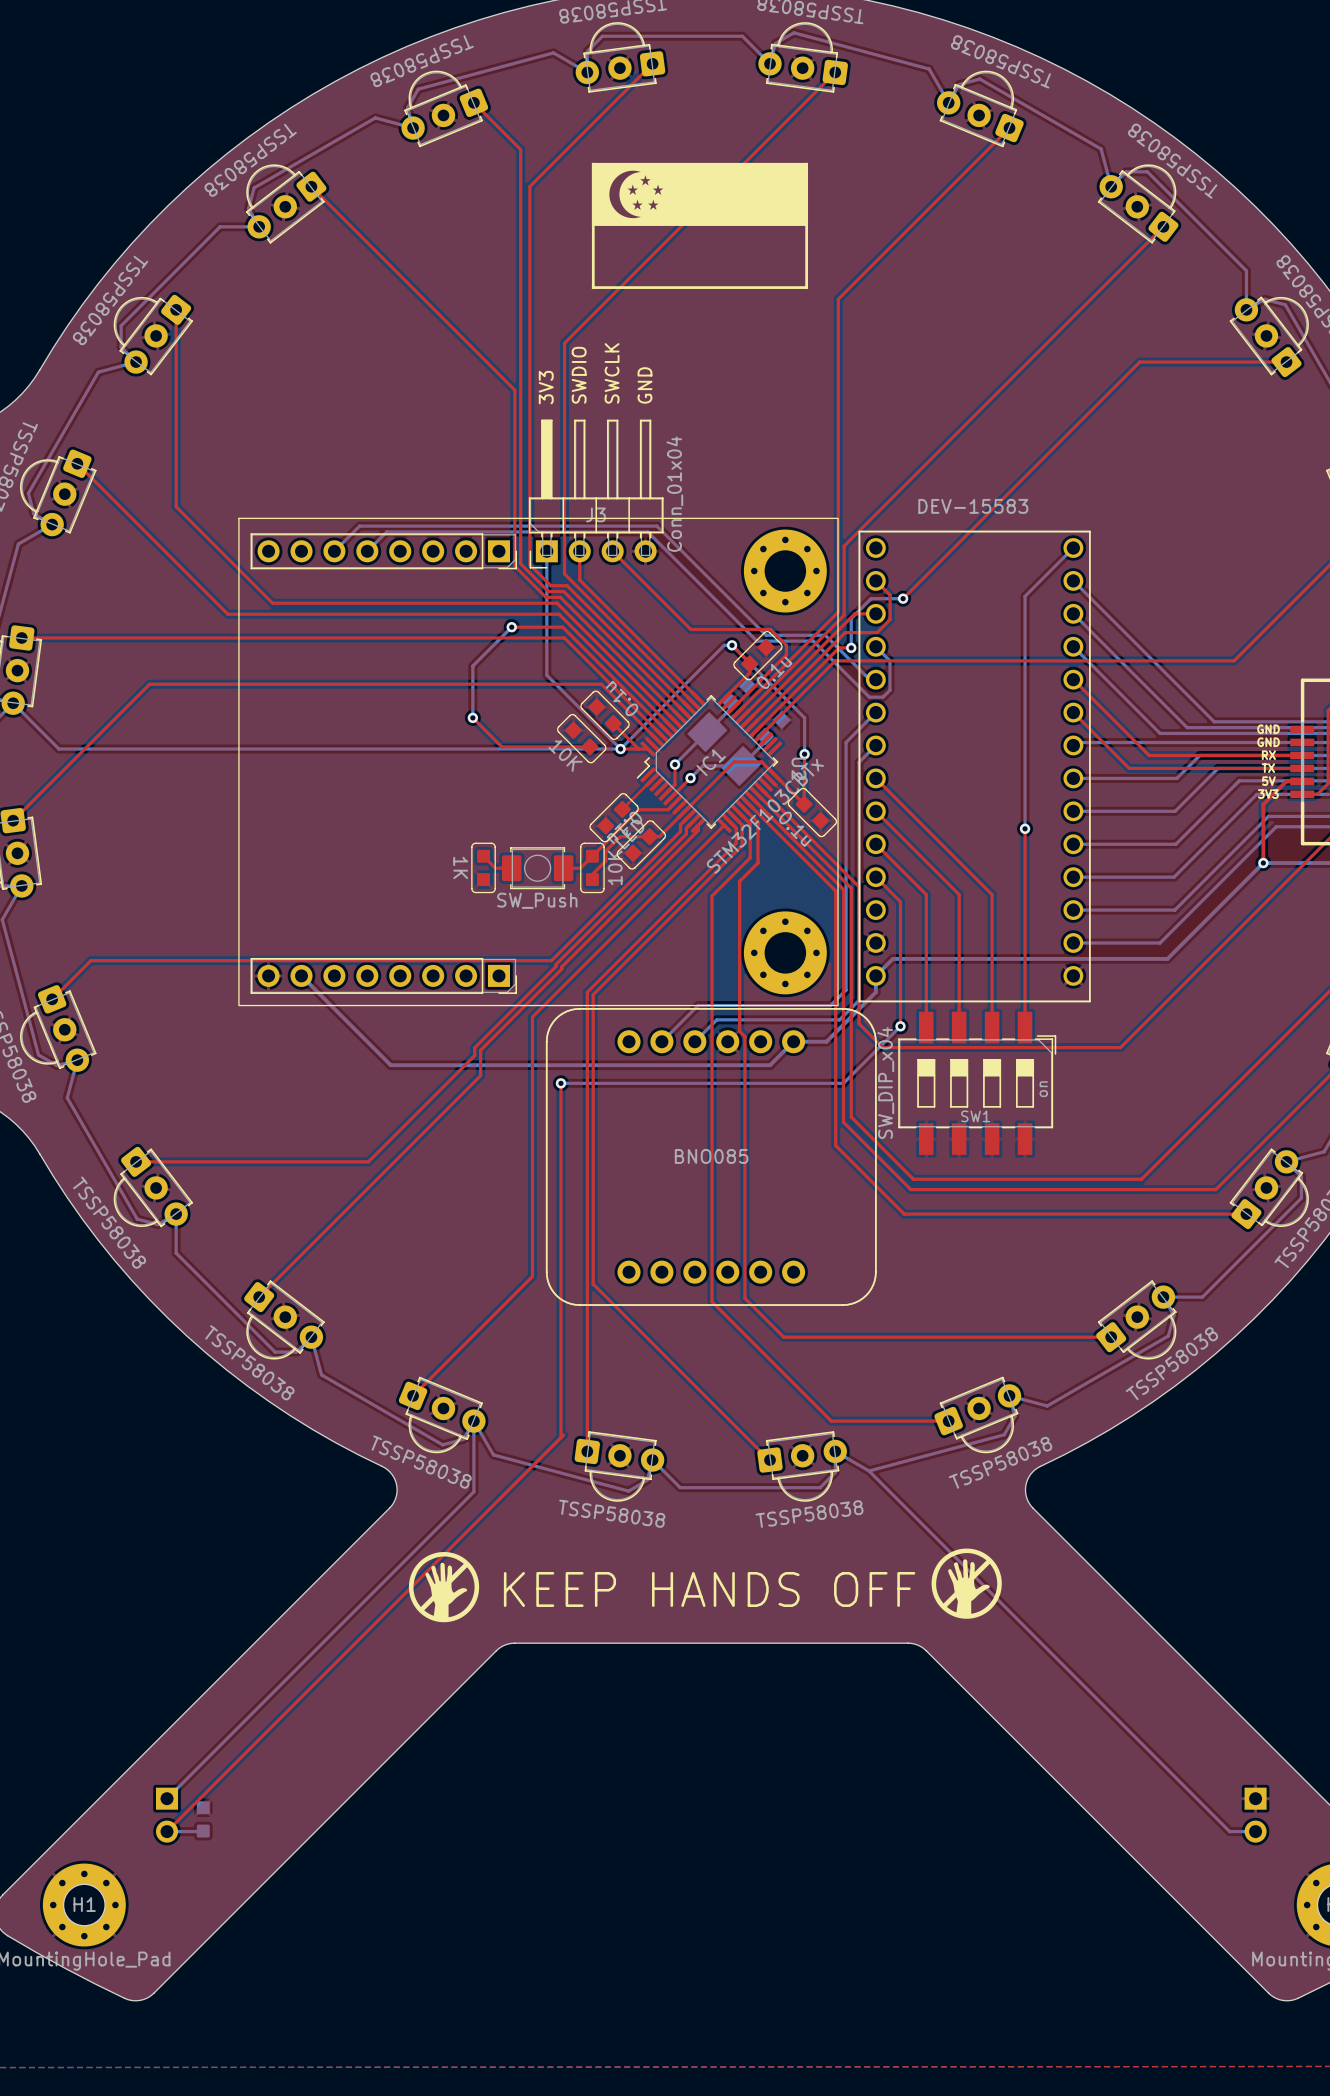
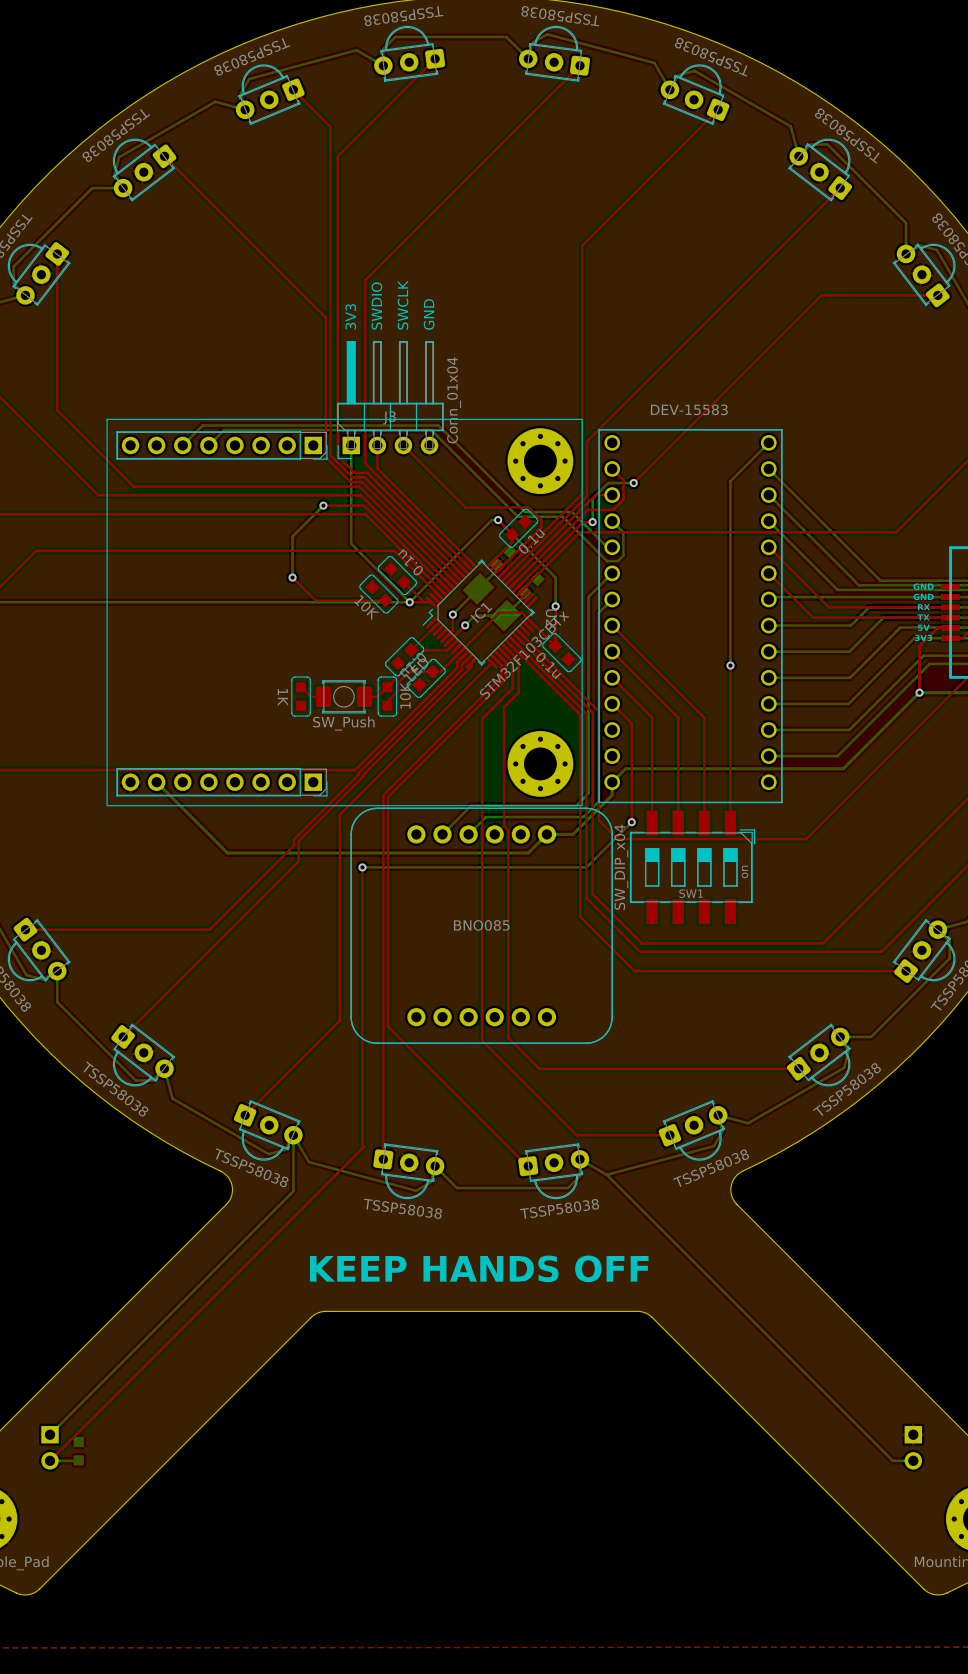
drawing: [591, 162, 809, 289] -> none
drawing: [931, 1548, 1002, 1619] -> none
drawing: [408, 1552, 480, 1623] -> none

